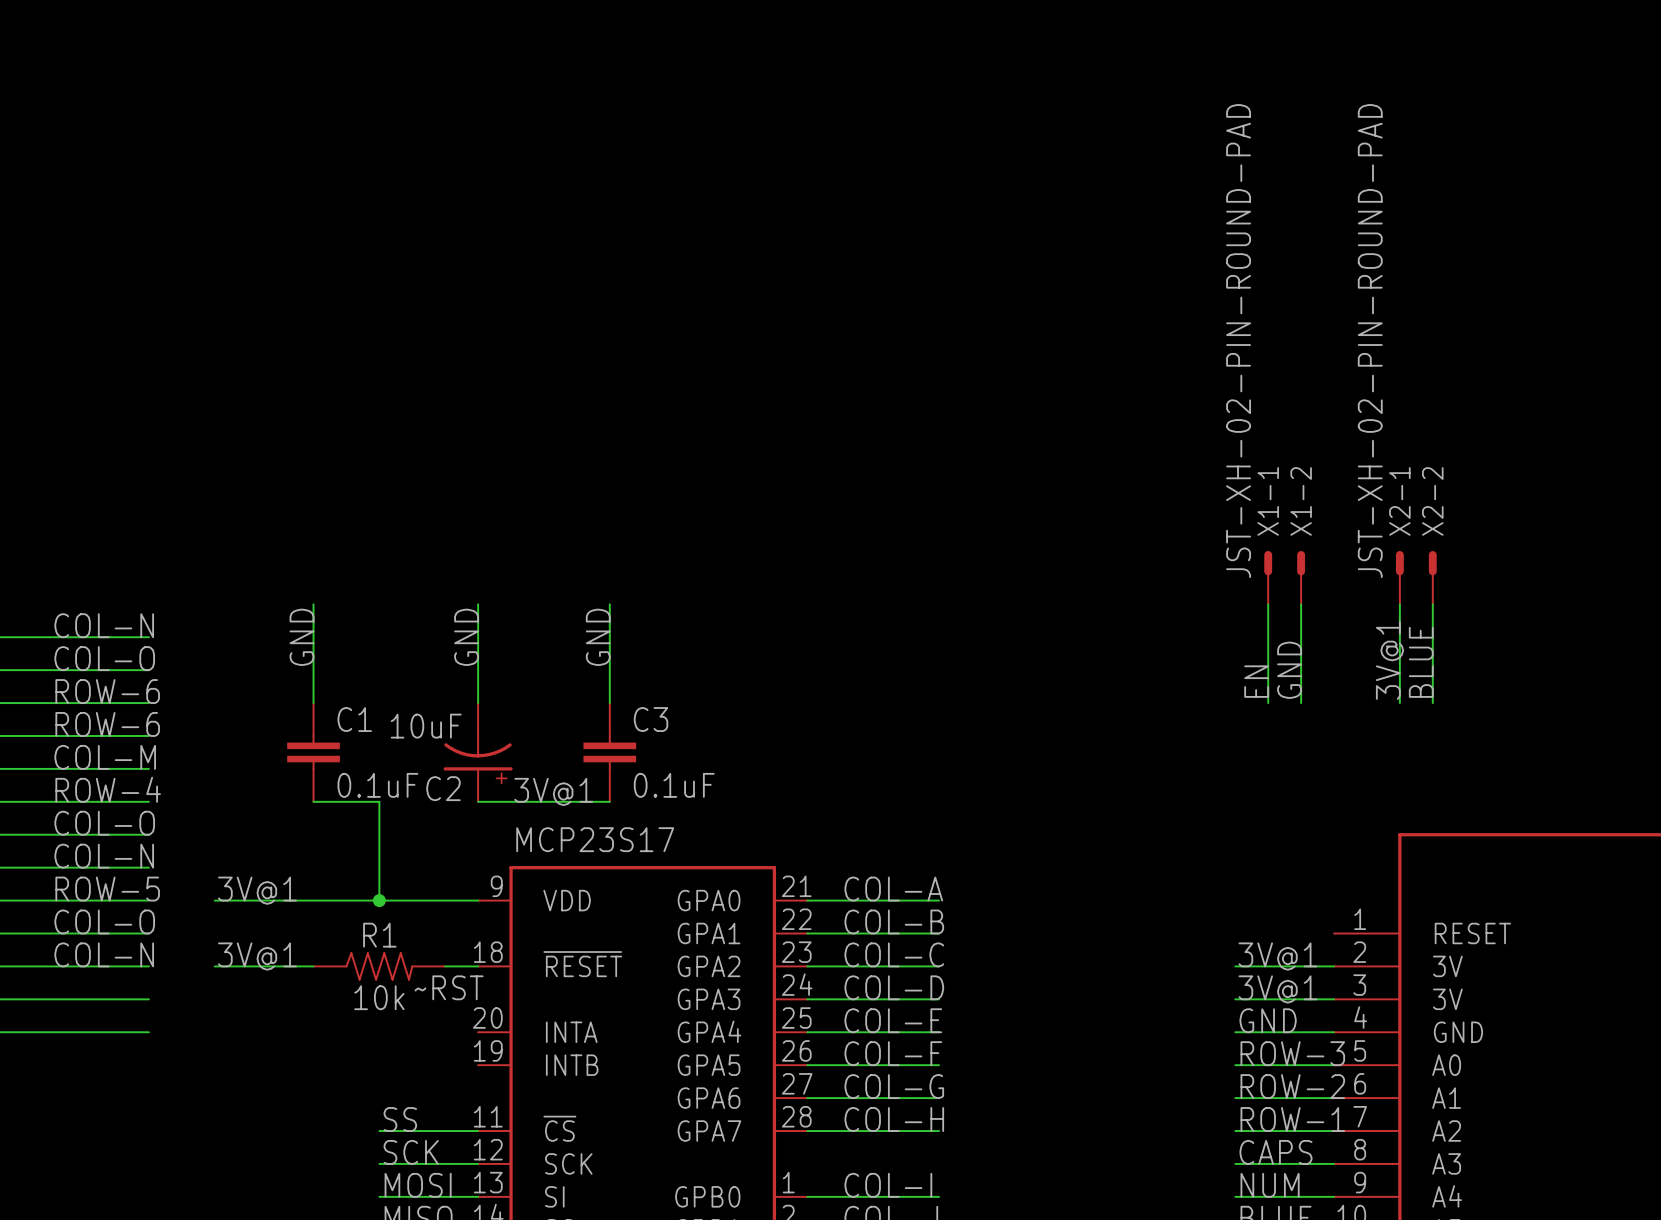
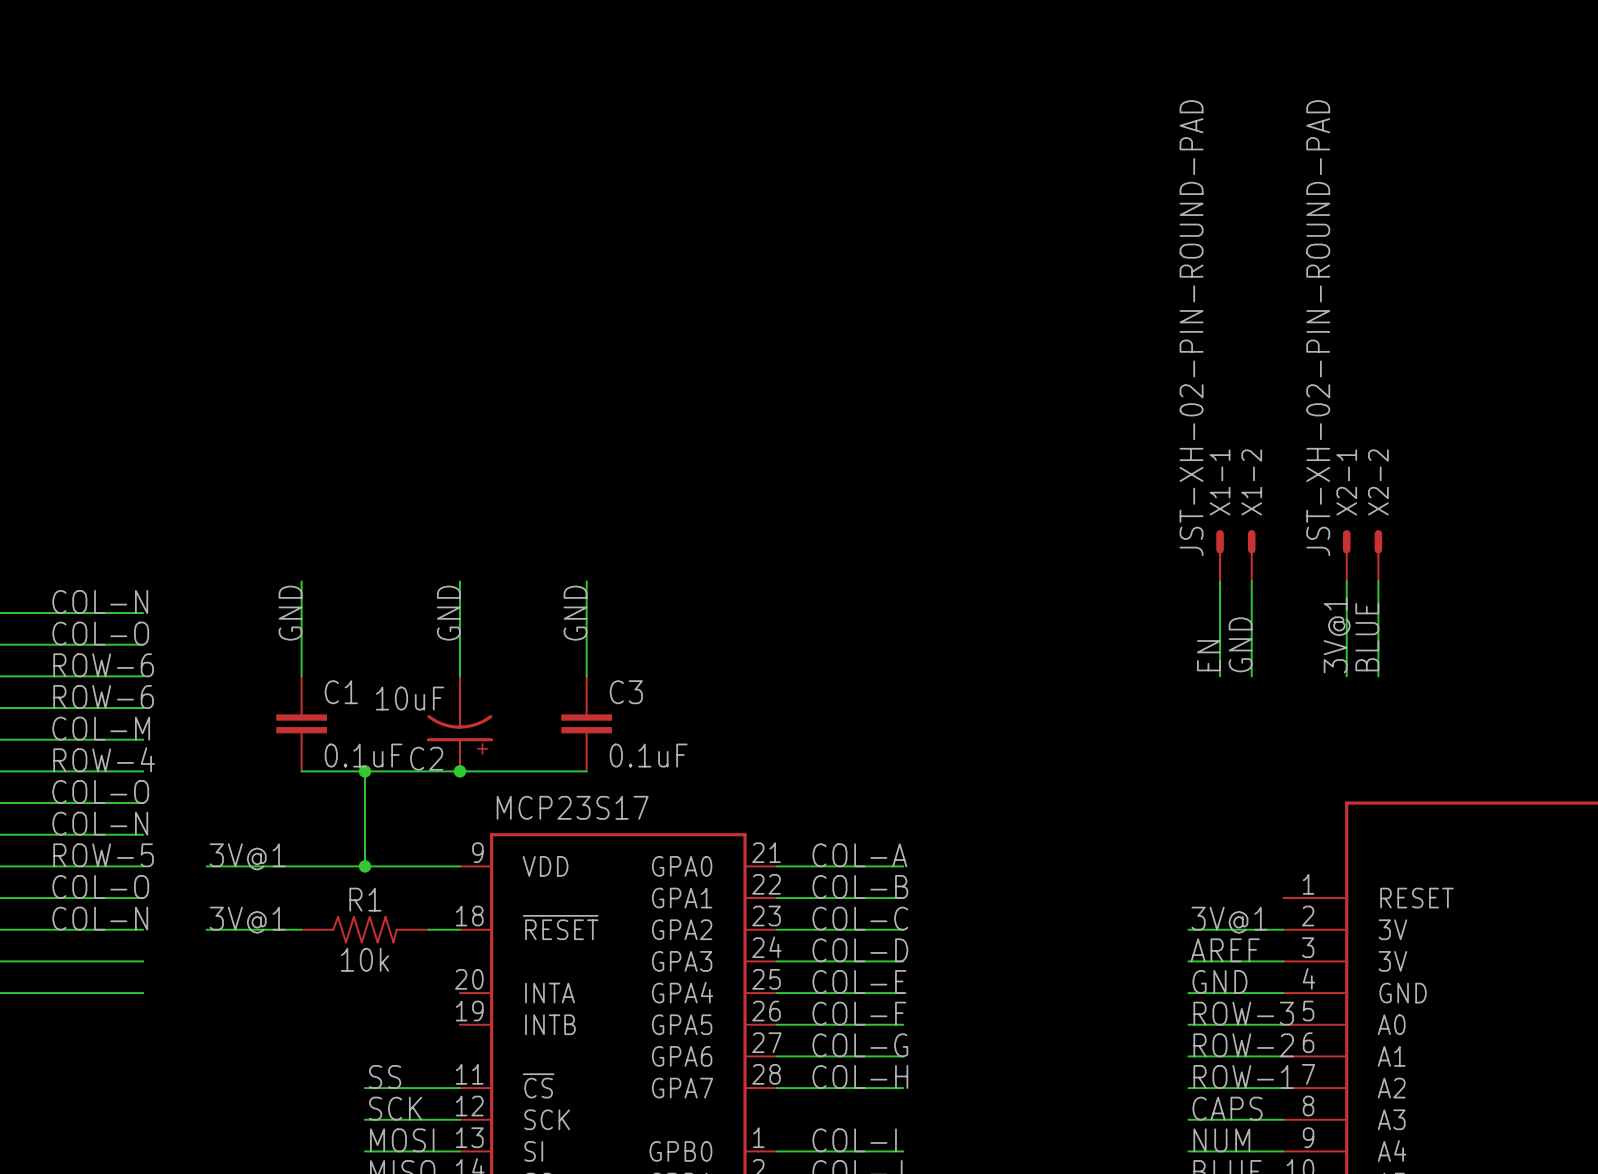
label: 3V@1 (553, 791) -> none
wire: none -> (364, 771) (459, 771)
junction: none -> (364, 771)
junction: none -> (459, 771)
label: ~RST (449, 987) -> none
label: 3V@1 (1277, 989) -> AREF (1225, 950)

